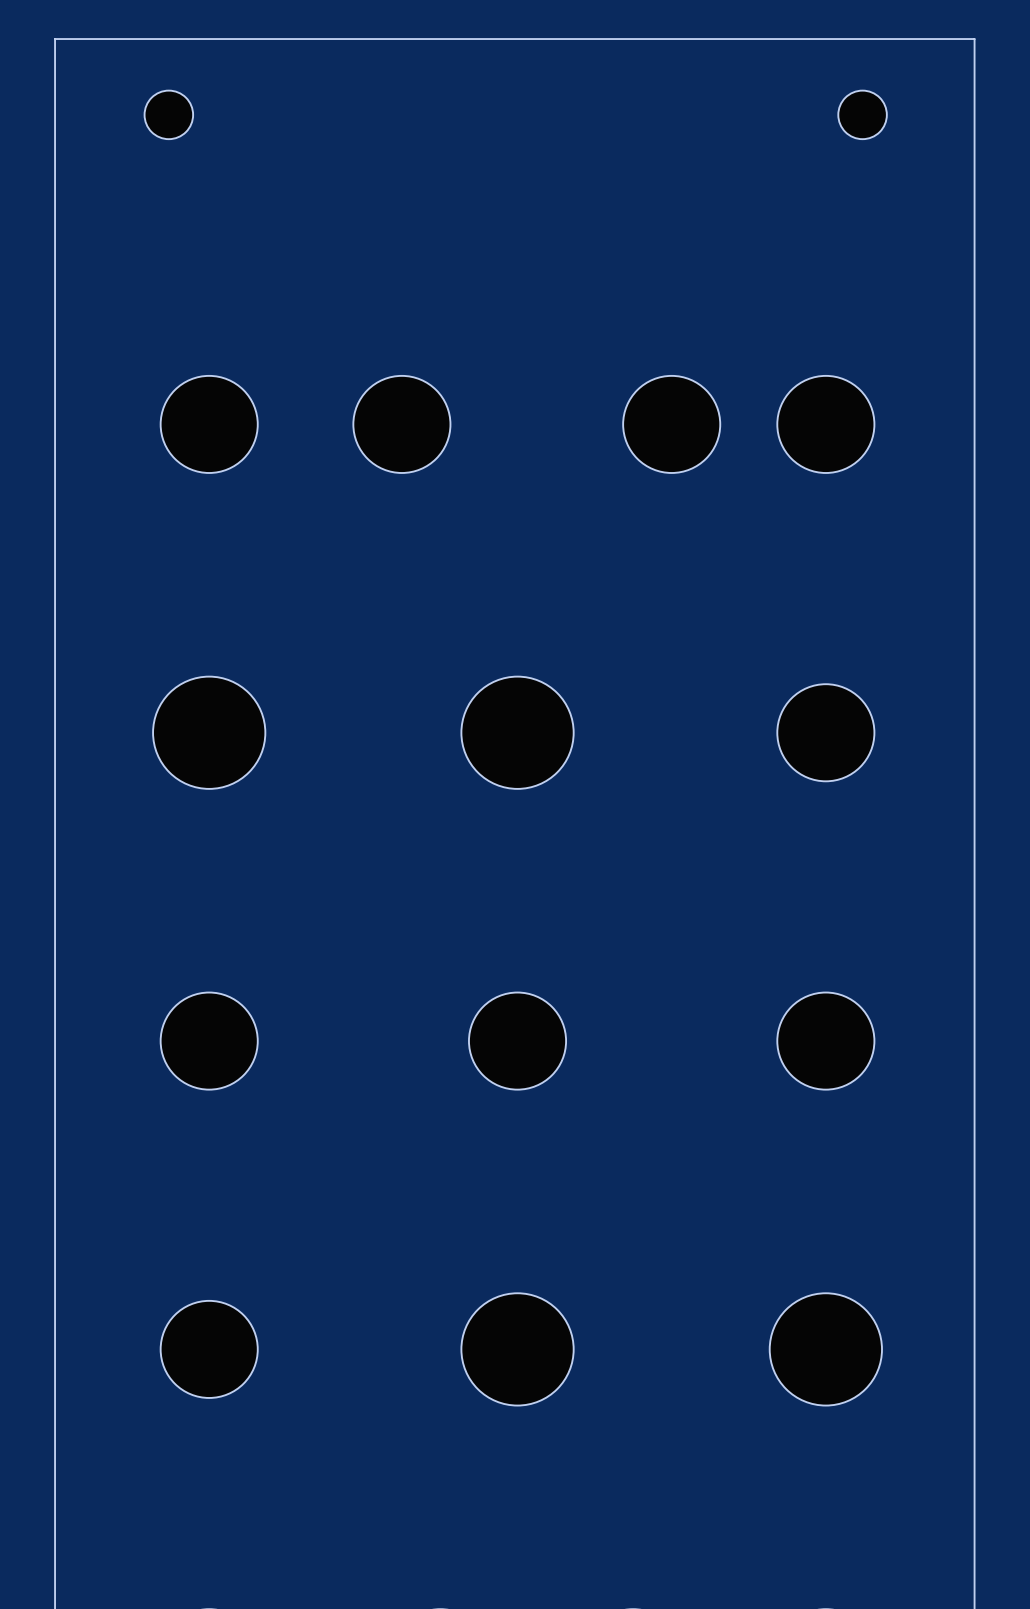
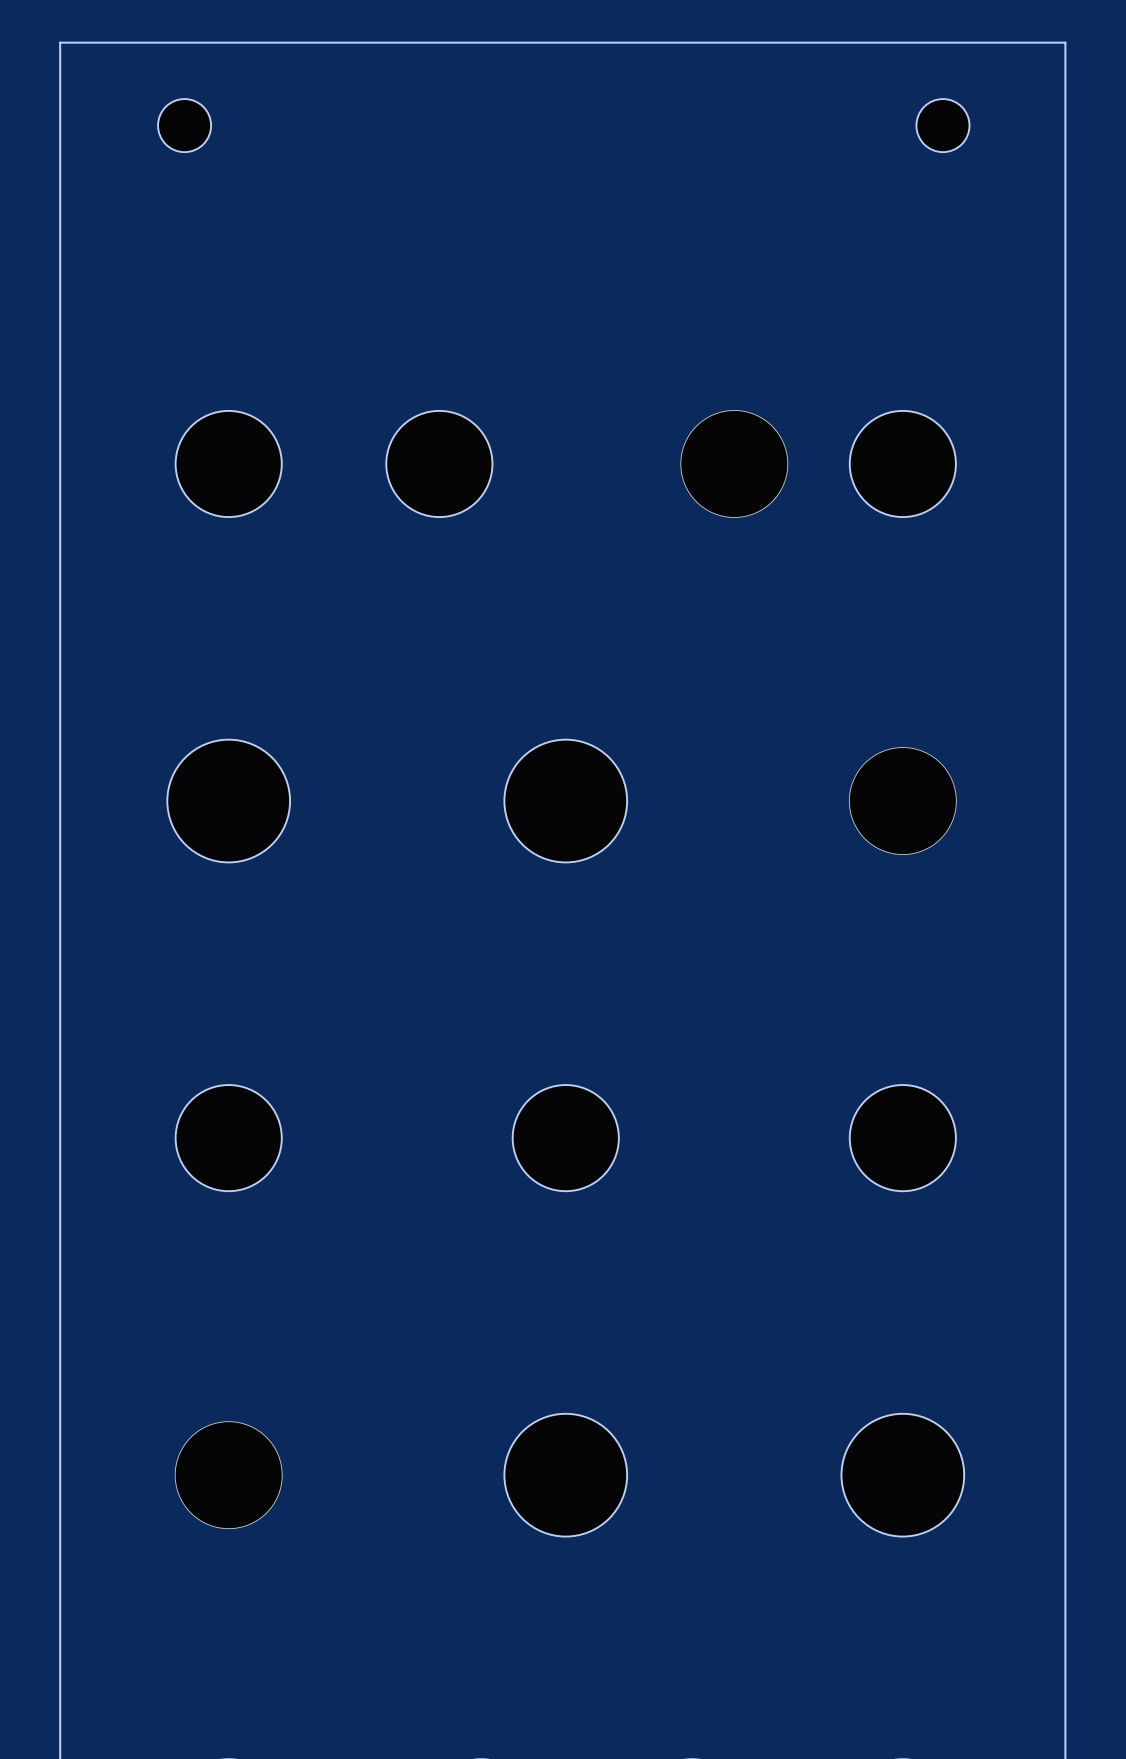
part footprint: [623, 375, 721, 473] -> [680, 410, 789, 518]
part footprint: [777, 684, 875, 782] -> [848, 747, 957, 855]
part footprint: [160, 1300, 258, 1398] -> [174, 1421, 283, 1530]

